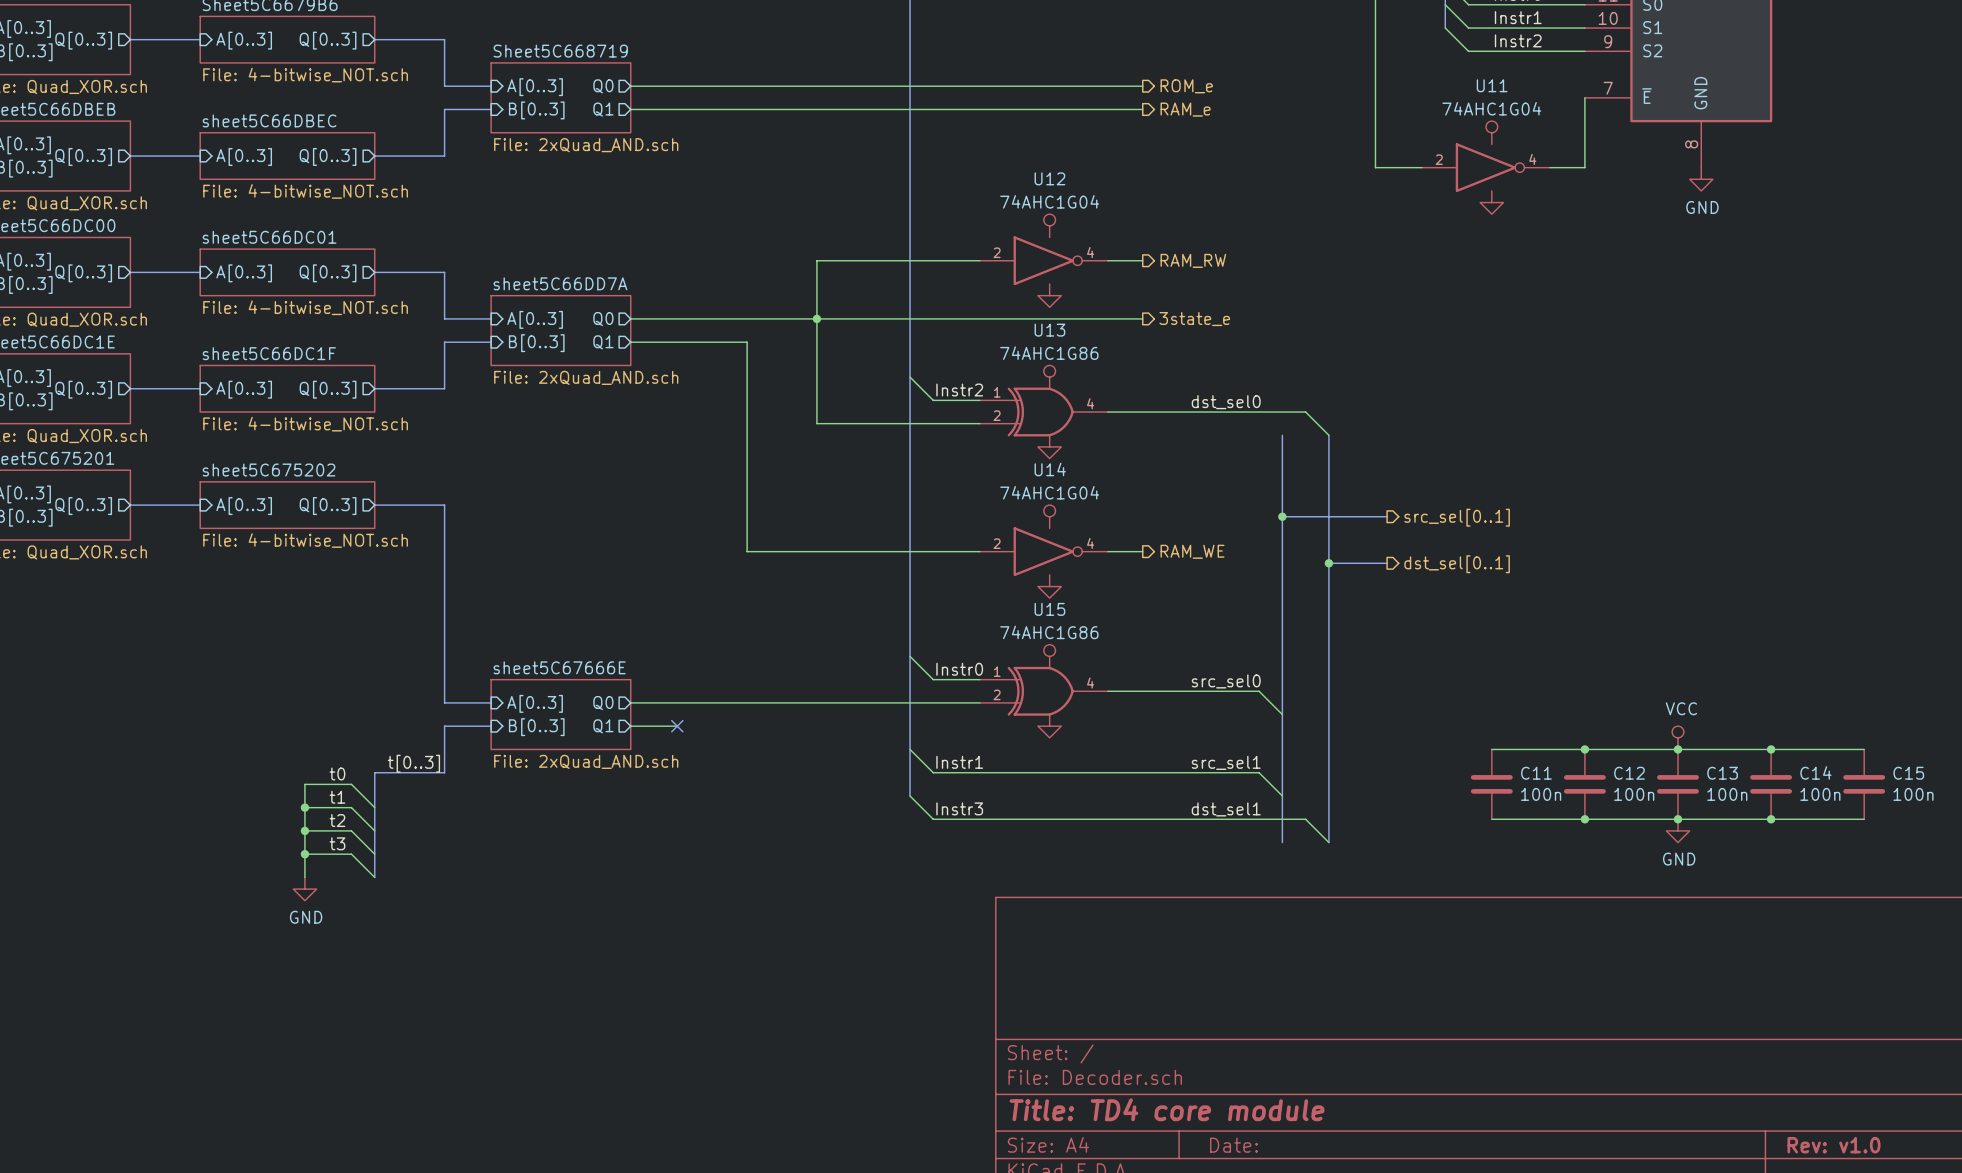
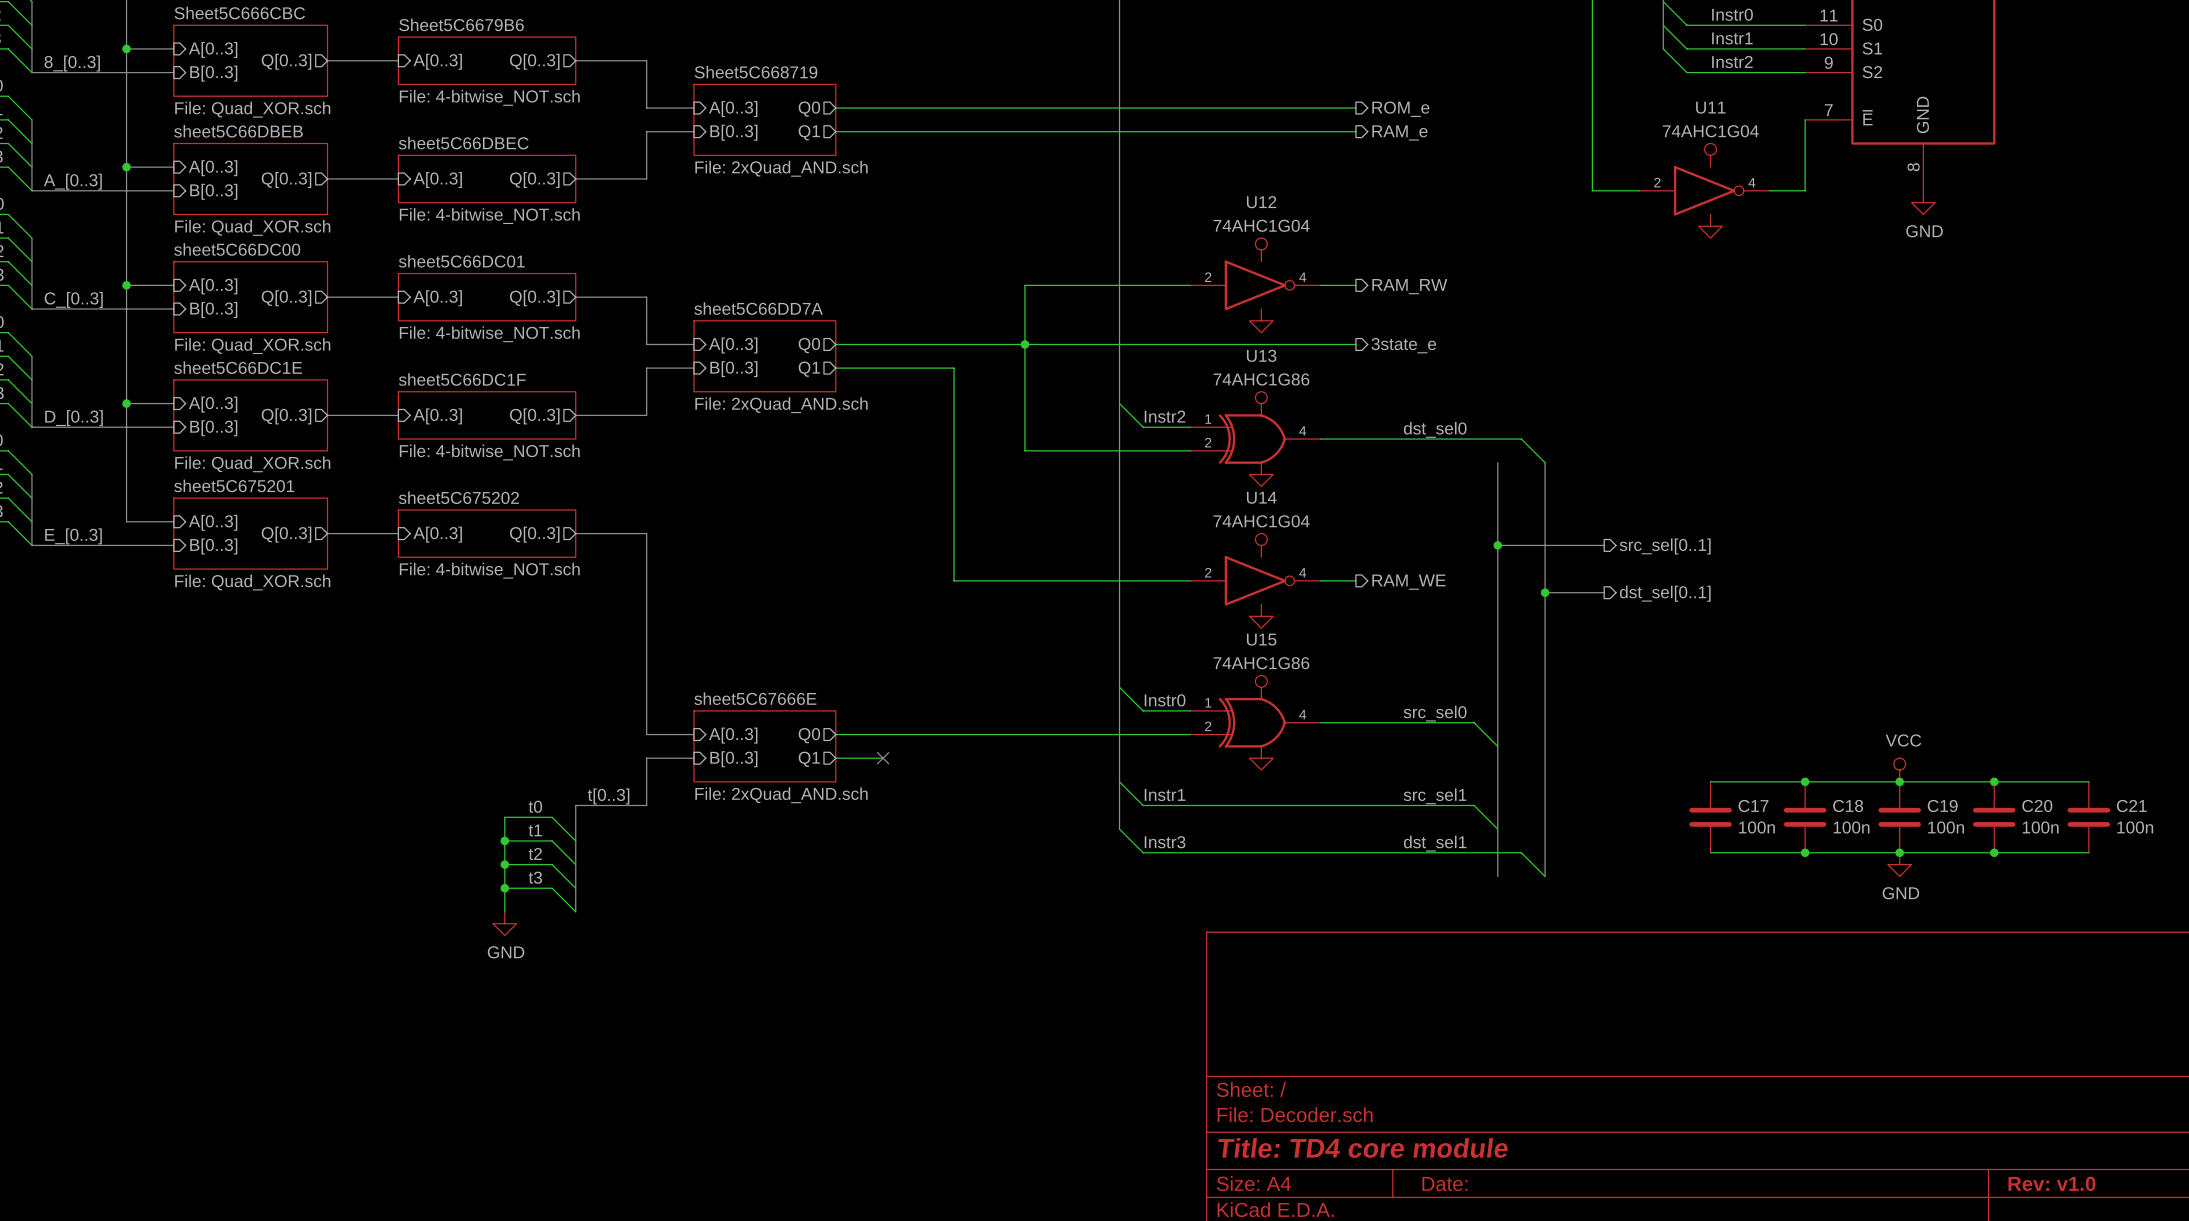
C14 name: C14 (1815, 772) -> C20 (2037, 805)
C11 name: C11 (1536, 773) -> C17 (1753, 805)
C12 name: C12 (1629, 773) -> C18 (1848, 805)
C13 name: C13 (1722, 773) -> C19 (1942, 805)
C15 name: C15 (1908, 773) -> C21 (2131, 805)

